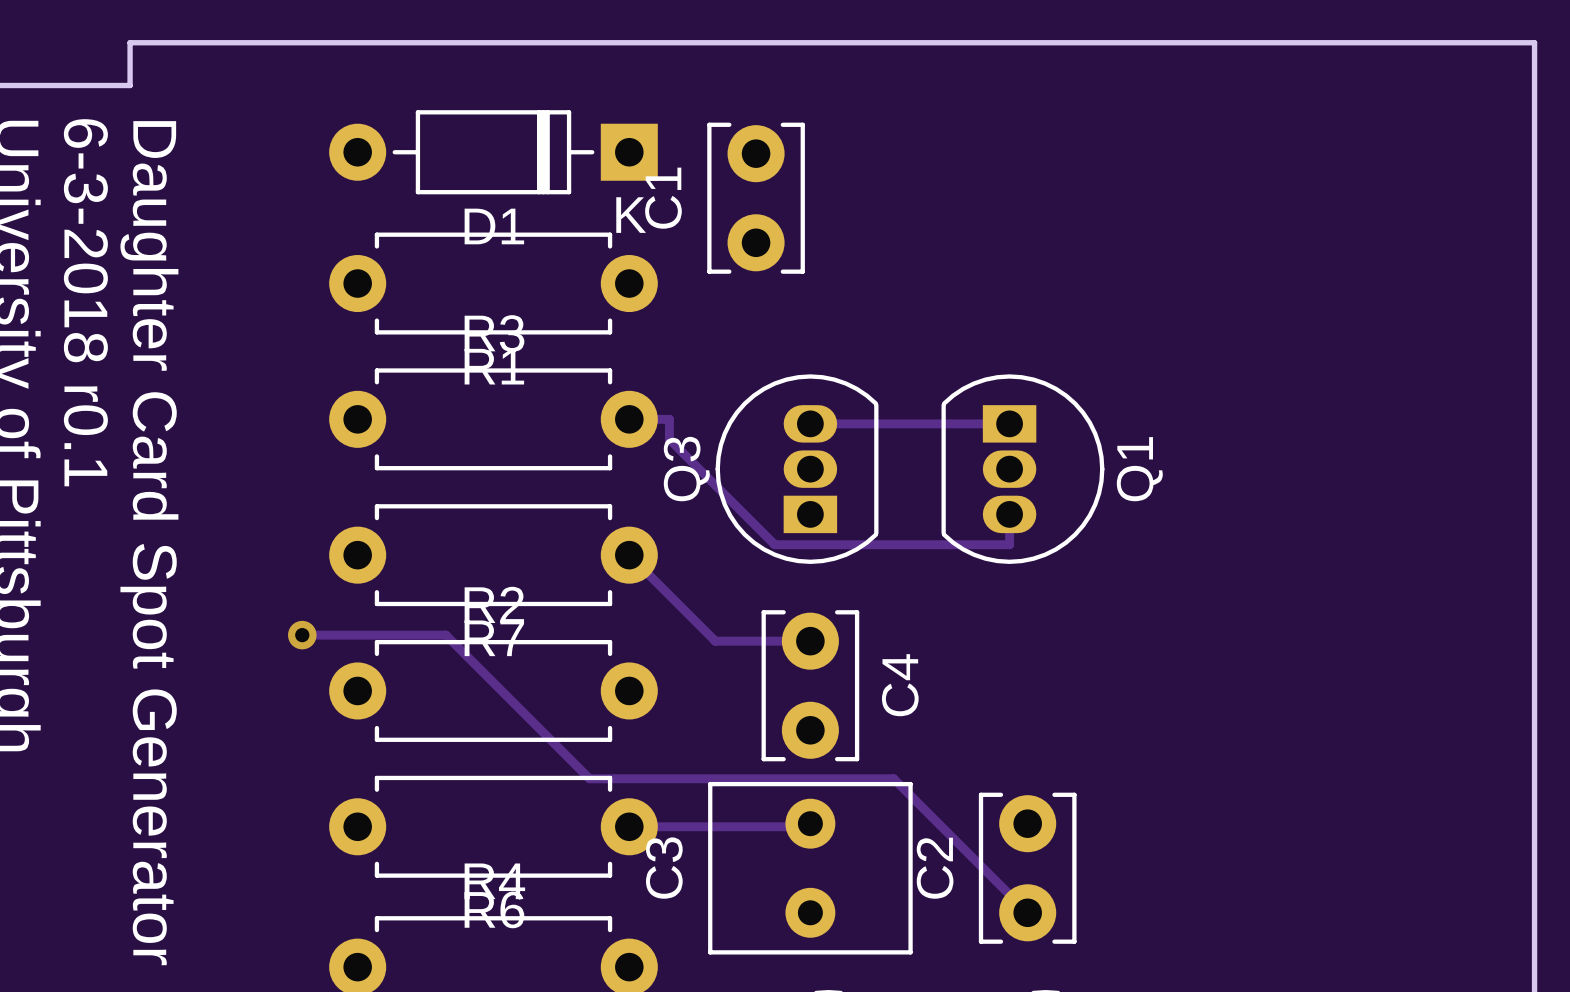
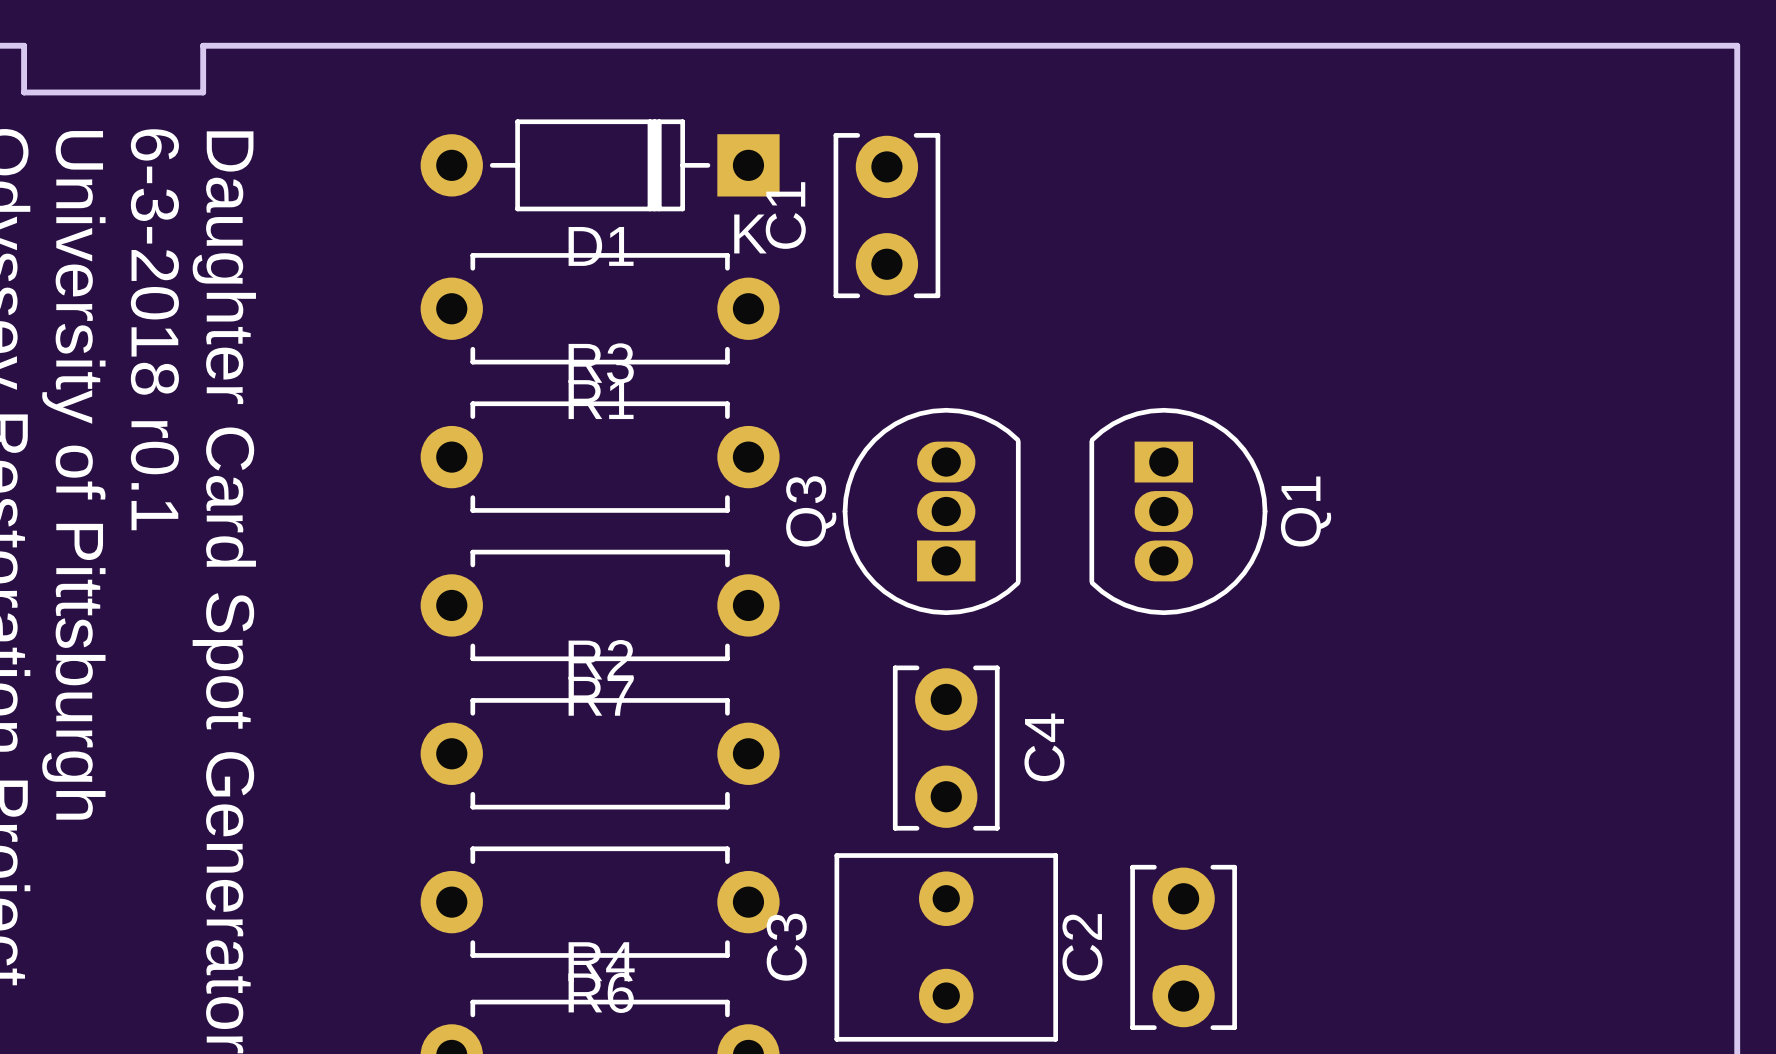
track: (629, 419) (669, 419) (669, 439) (774, 544) (1009, 544) (1009, 514) -> none
track: (810, 423) (1009, 423) -> none
track: (629, 555) (715, 641) (810, 641) -> none
track: (302, 635) (445, 635) (589, 778) (893, 778) (1027, 912) -> none
via: (302, 635) -> none
track: (810, 823) (807, 826) (629, 826) -> none

